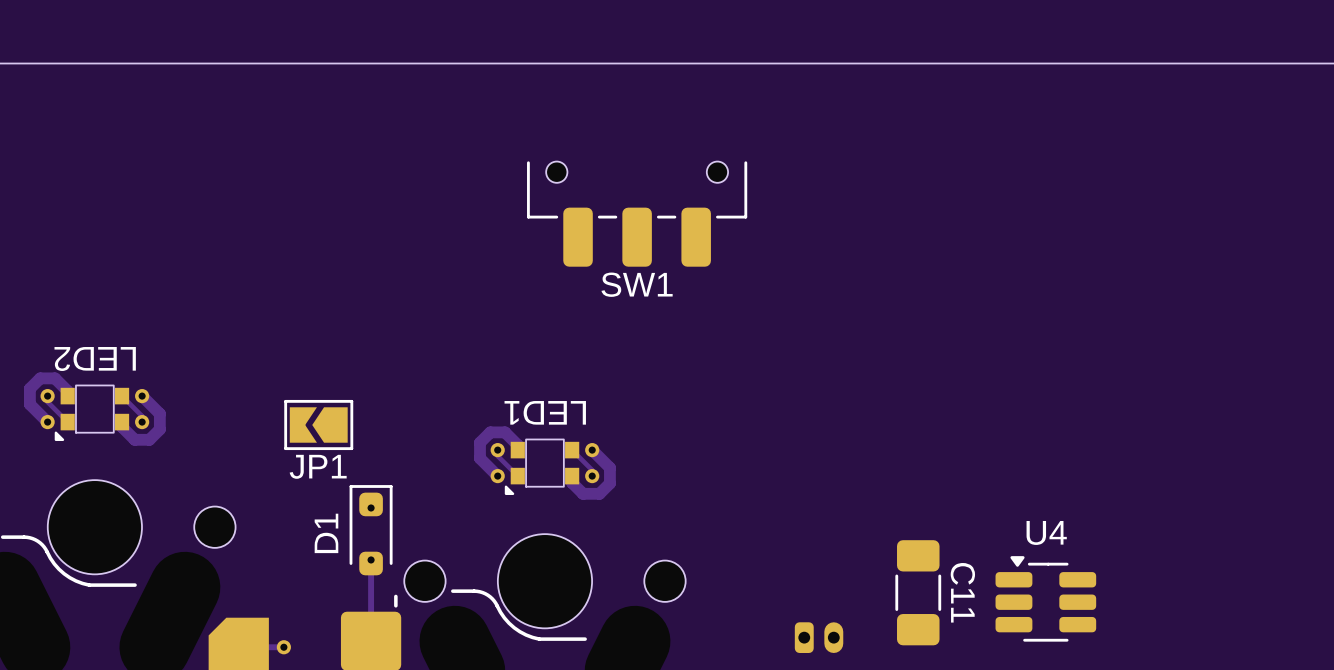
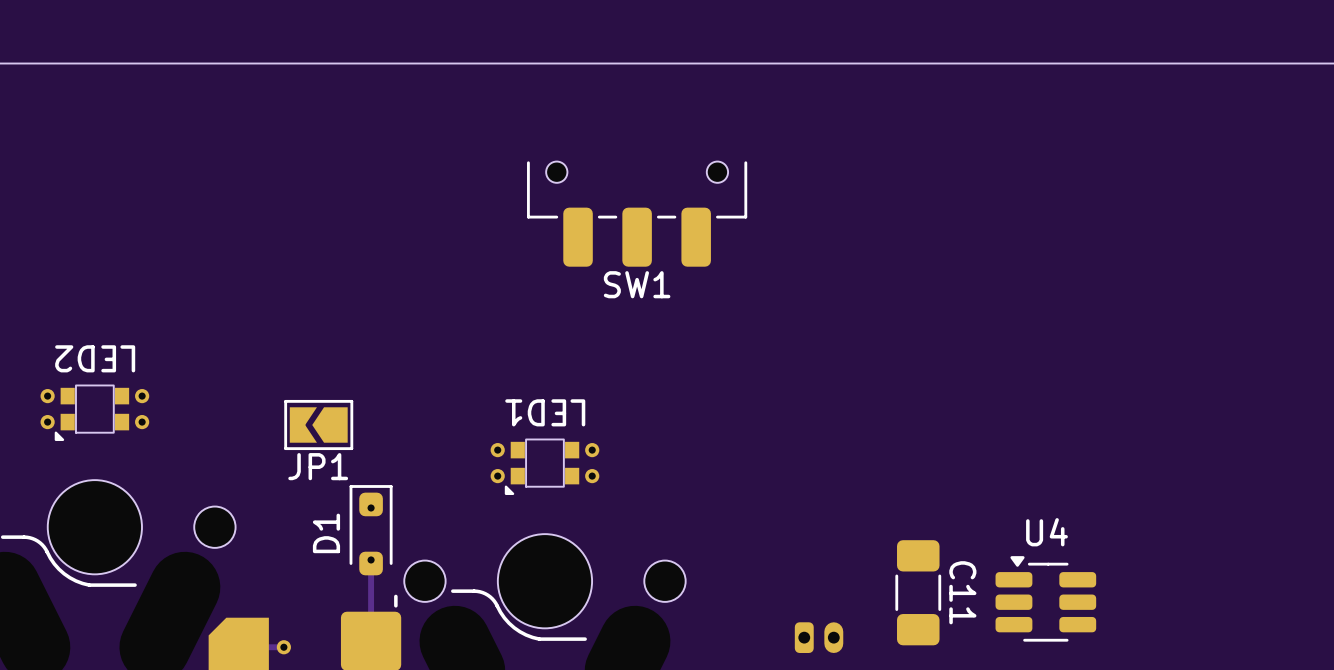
track: (47, 396) (47, 402) (67, 422) -> none
track: (67, 396) (67, 391) (54, 378) (40, 378) (29, 388) (29, 404) (47, 422) -> none
track: (122, 396) (142, 416) (142, 422) -> none
track: (142, 396) (159, 413) (159, 429) (149, 439) (134, 439) (122, 427) (122, 422) -> none
track: (497, 450) (497, 456) (517, 476) -> none
track: (517, 450) (517, 445) (505, 432) (490, 432) (479, 442) (479, 458) (497, 476) -> none
track: (572, 450) (592, 470) (592, 476) -> none
track: (592, 450) (609, 467) (609, 483) (599, 493) (583, 493) (572, 482) (572, 476) -> none

